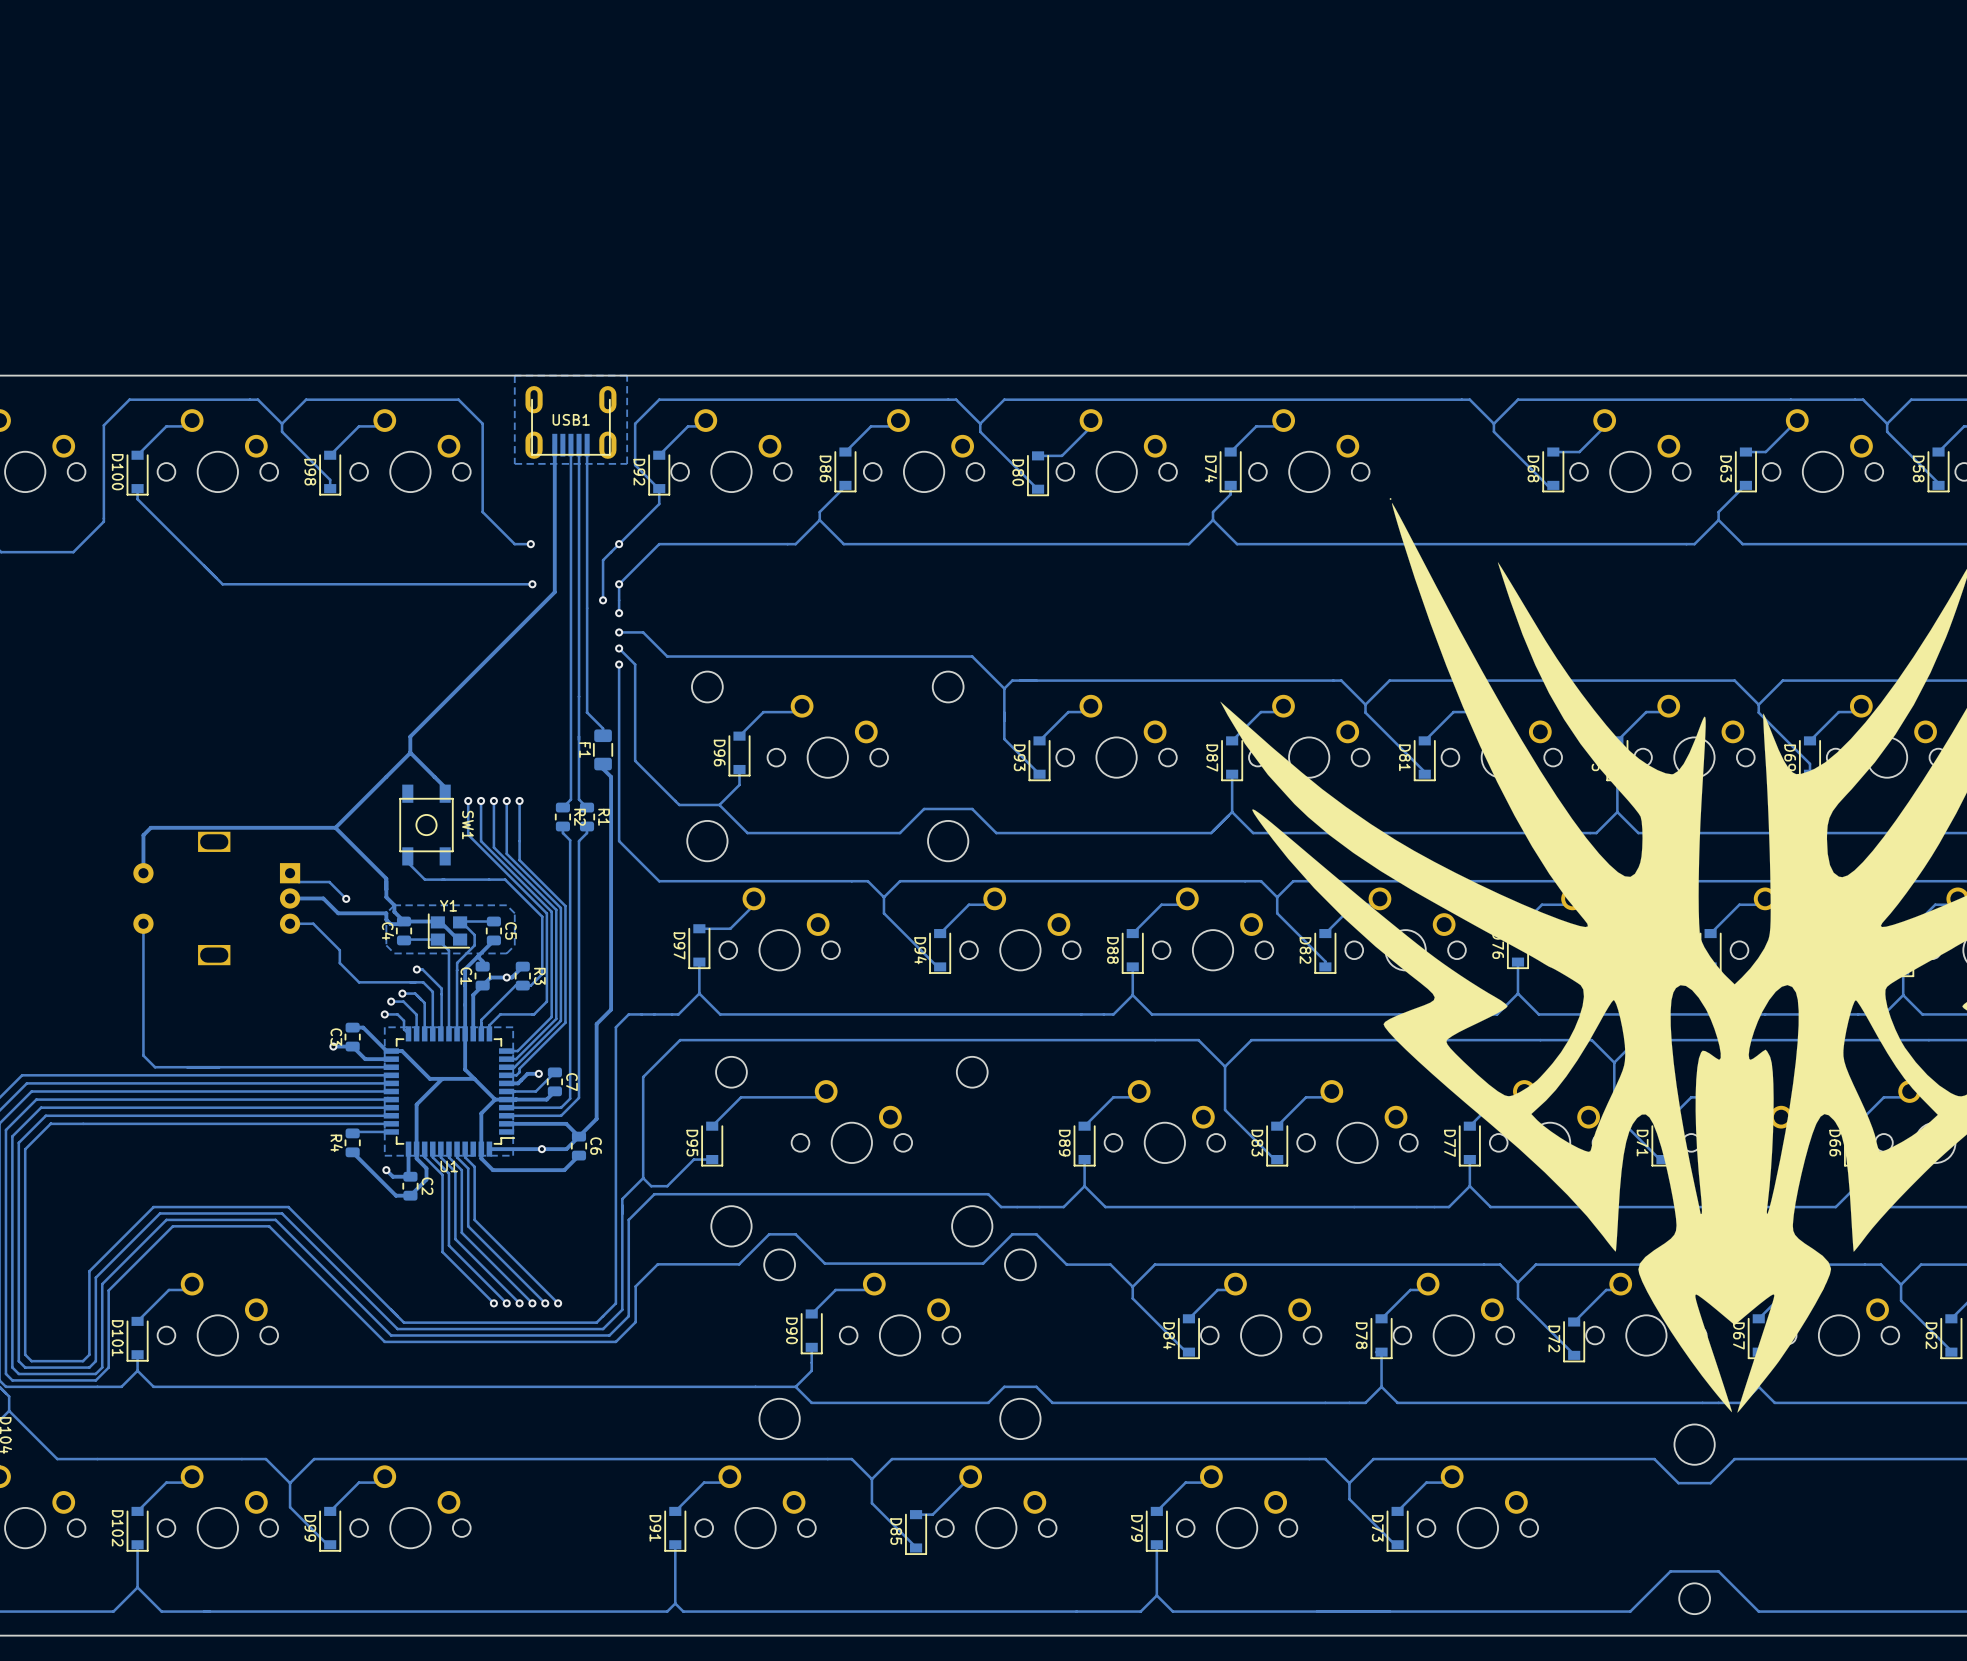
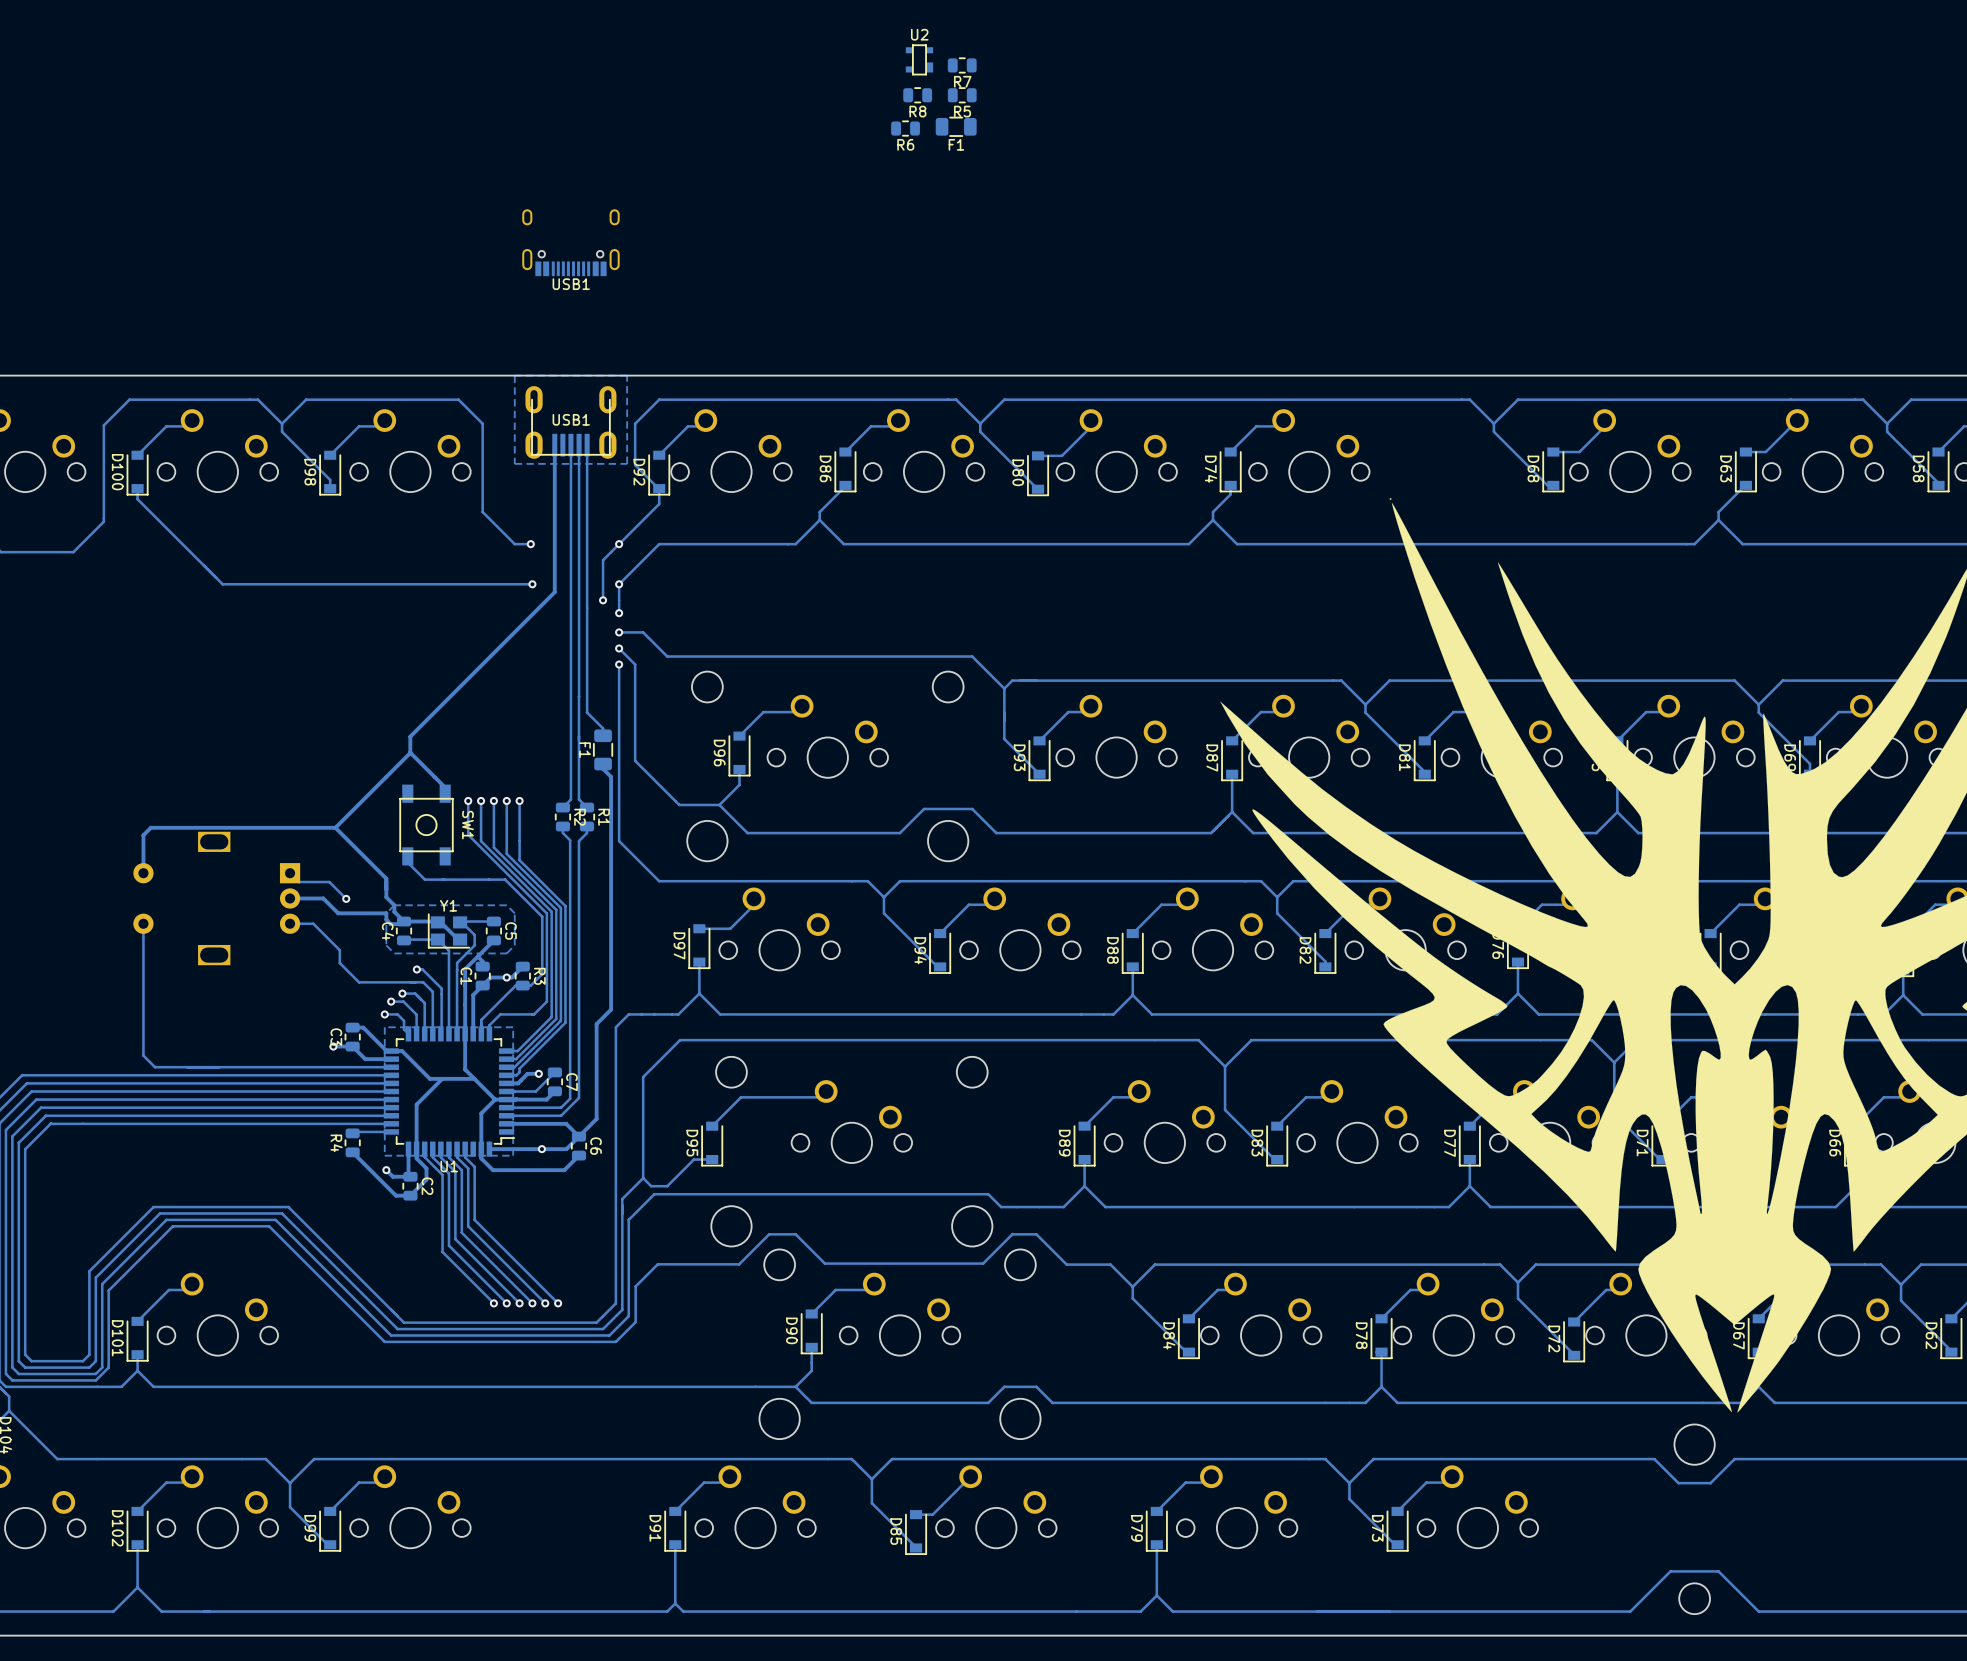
U2: none -> (919, 59)
R7: none -> (962, 65)
R8: none -> (917, 95)
R5: none -> (962, 95)
F1: none -> (956, 126)
R6: none -> (905, 128)
USB1: none -> (570, 242)

